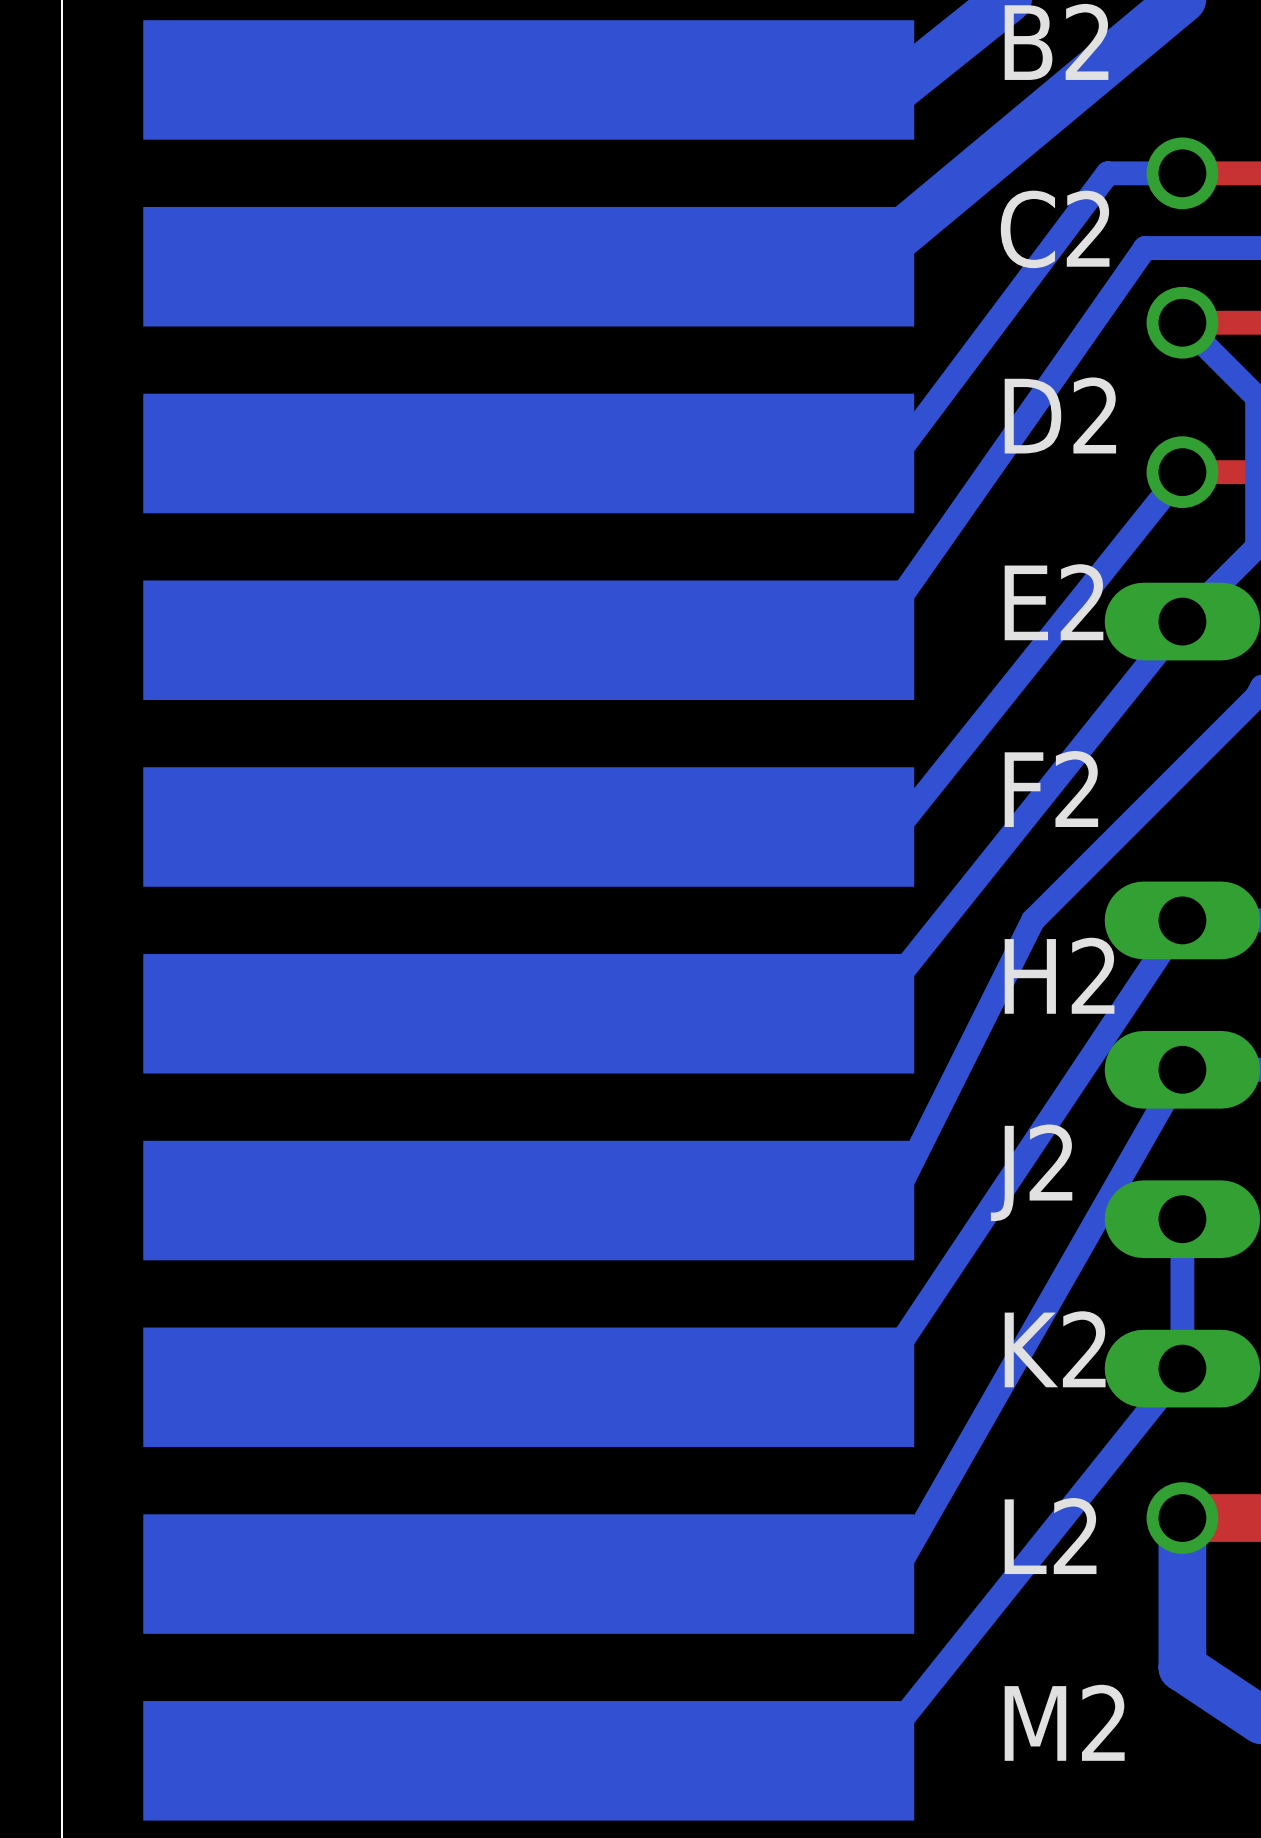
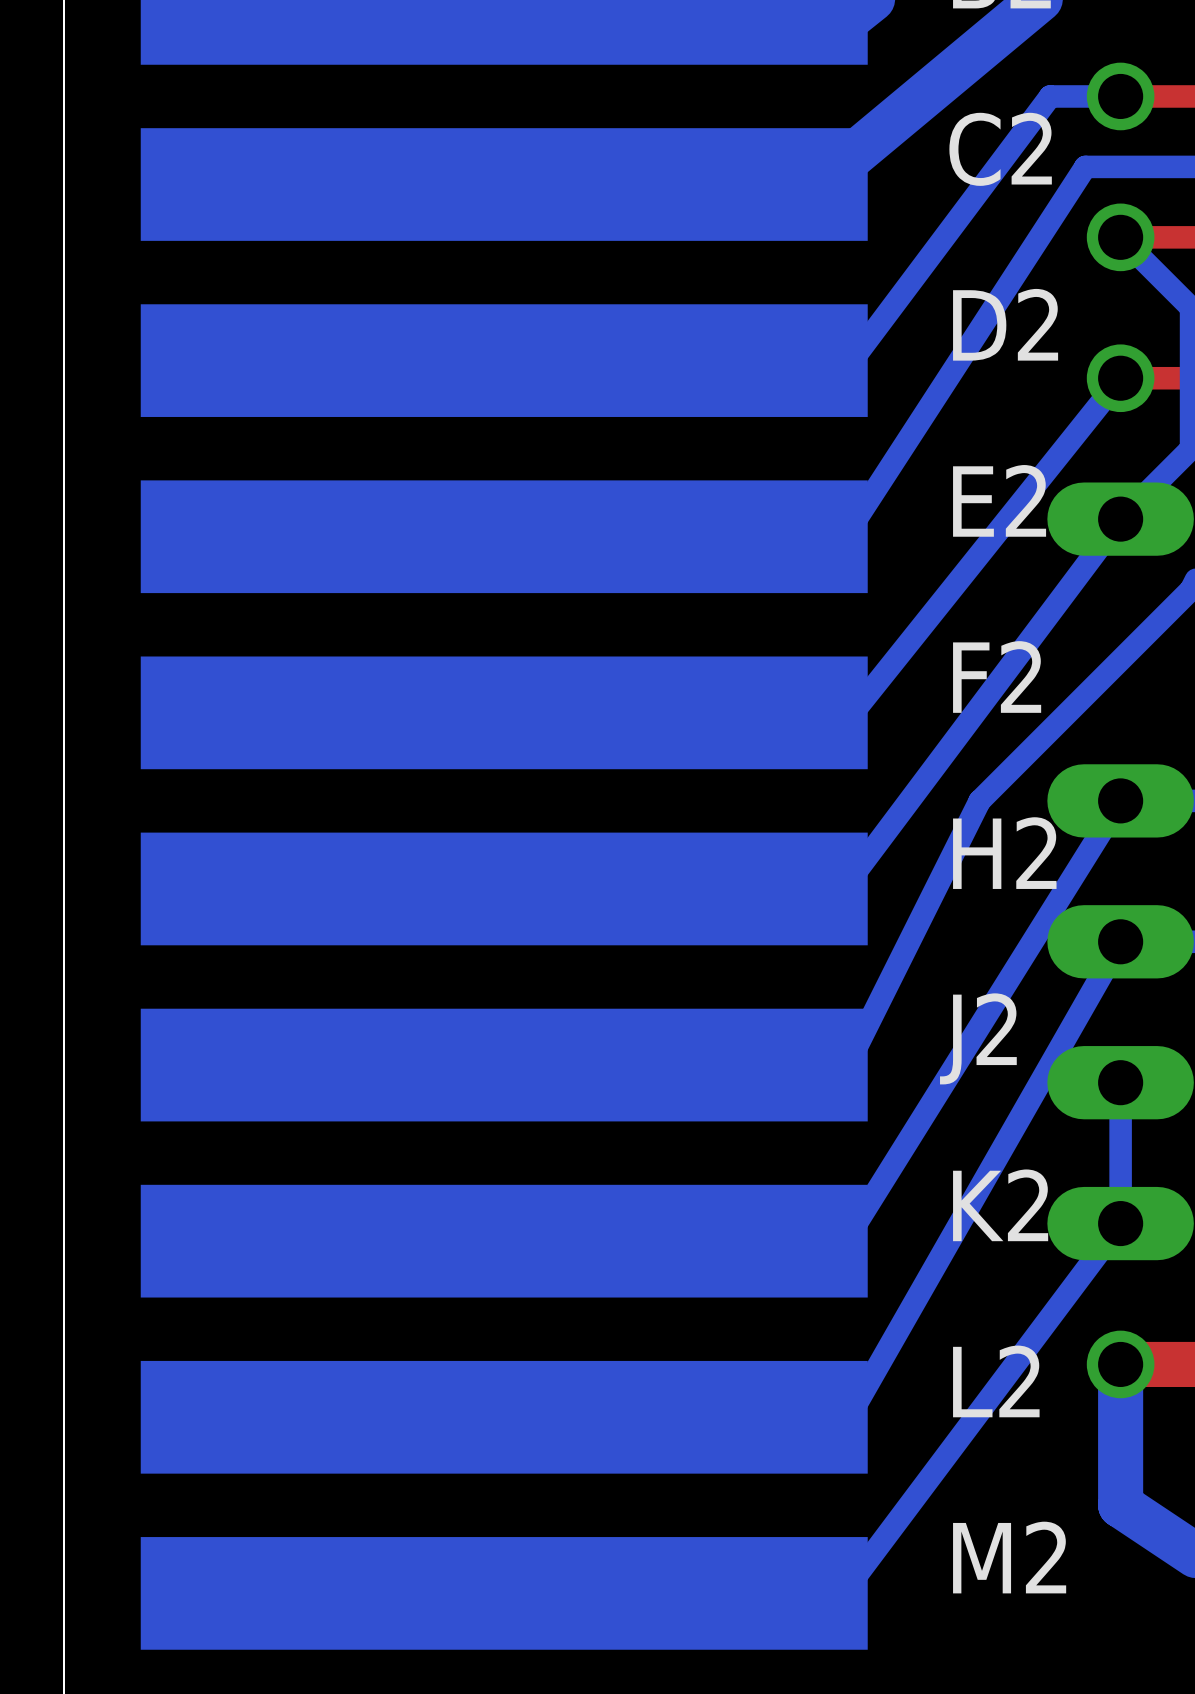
bottom track: (1145, 248) (883, 621) (528, 640) -> (1085, 166) (856, 519) (504, 536)
bottom track: (1182, 621) (883, 995) (528, 1013) -> (1120, 519) (856, 871) (504, 888)
bottom track: (1182, 920) (883, 1368) (528, 1387) -> (1120, 800) (856, 1223) (504, 1241)
bottom track: (1182, 1368) (883, 1742) (528, 1760) -> (1120, 1223) (856, 1575) (504, 1593)

